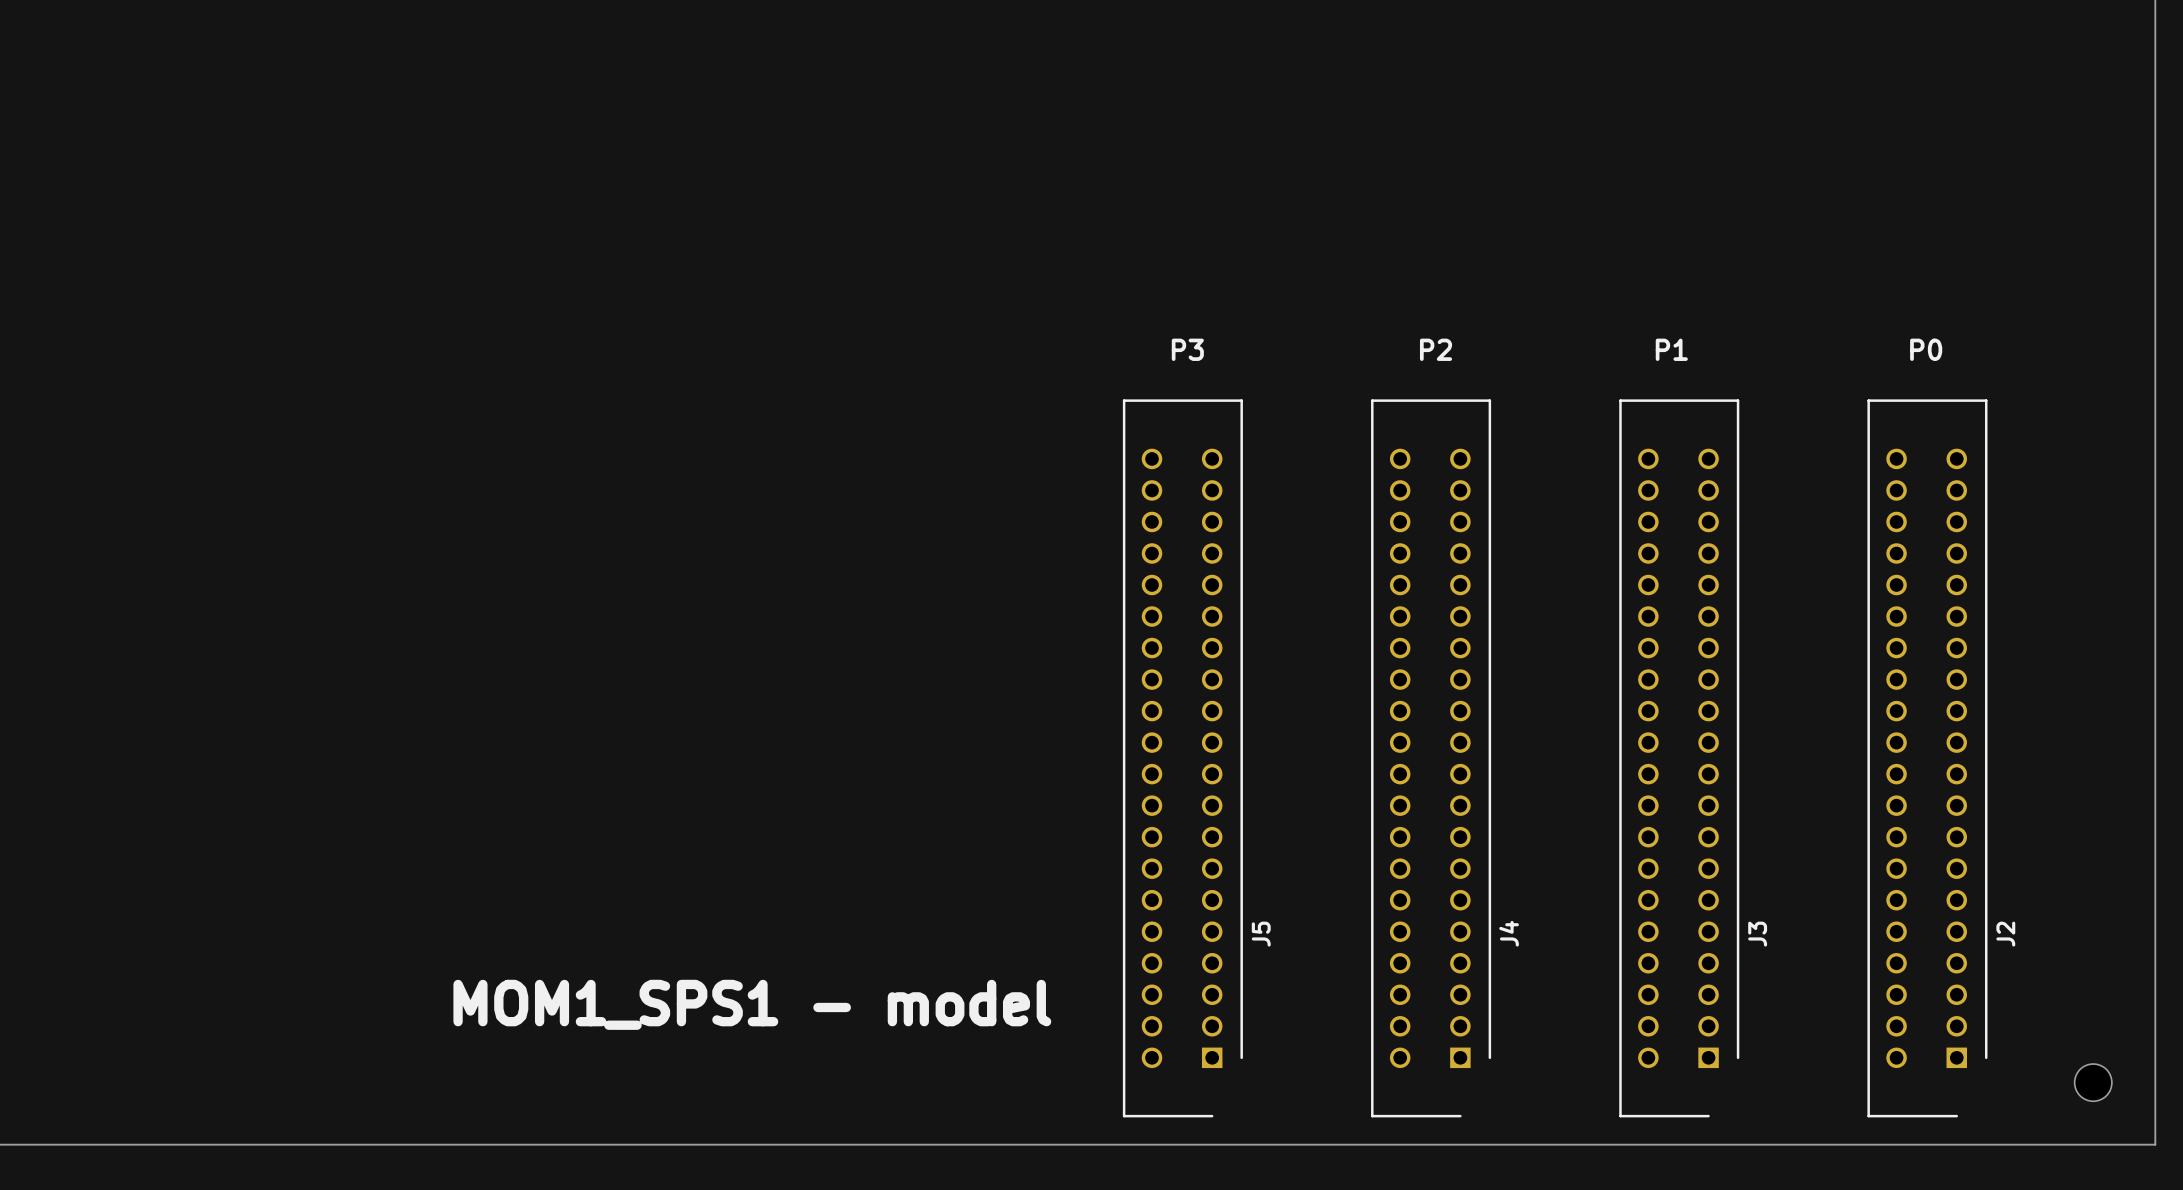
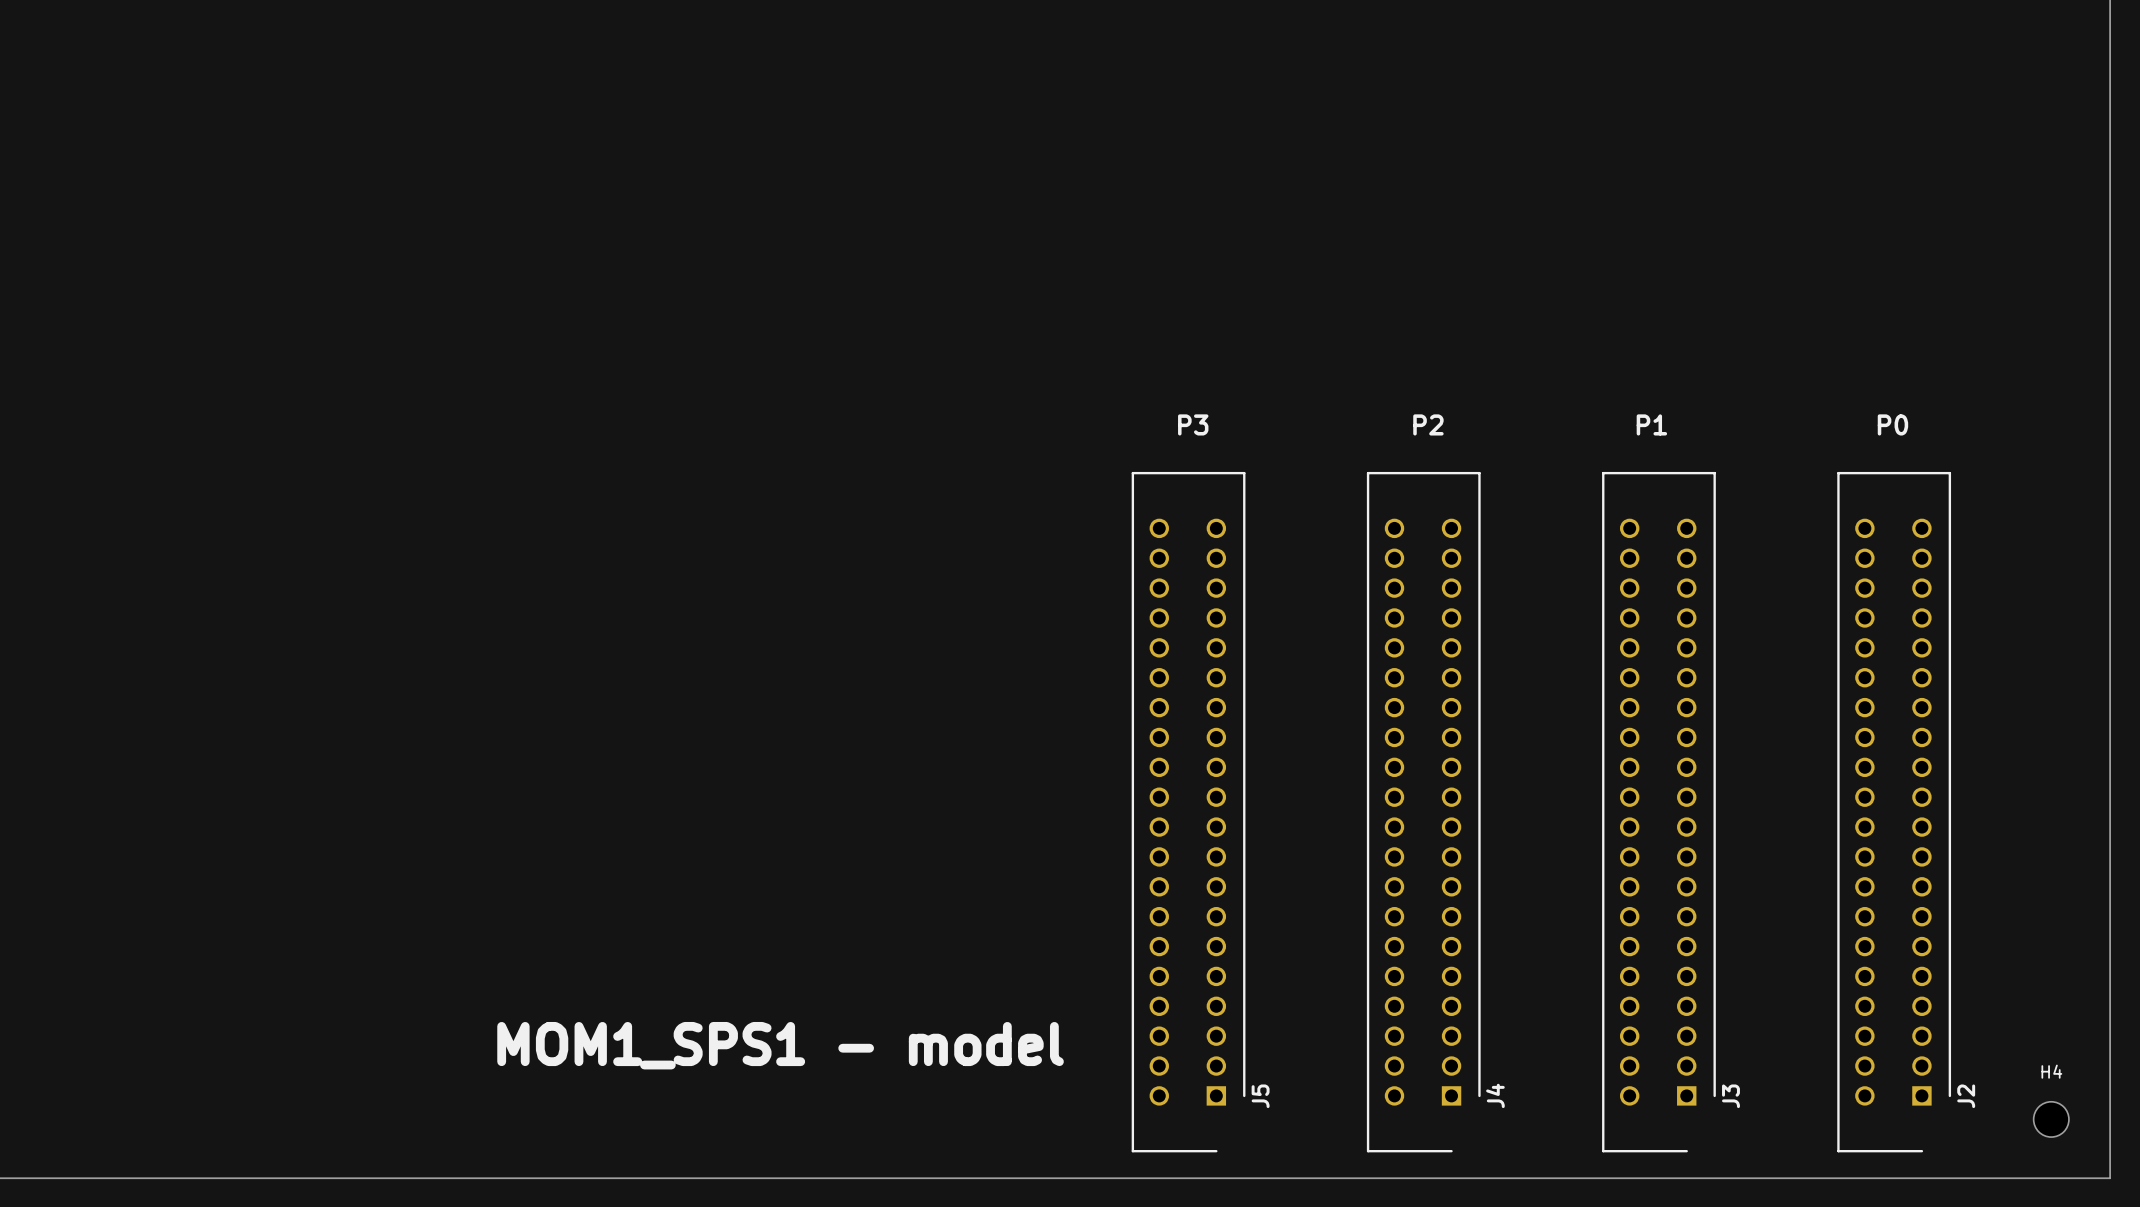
J4 name position: J4 (1509, 933) -> J4 (1495, 1095)
J5 name position: J5 (1261, 934) -> J5 (1260, 1096)
J3 name position: J3 (1757, 934) -> J3 (1730, 1096)
J2 name position: J2 (2005, 934) -> J2 (1966, 1096)
H4 name: none -> H4 (2051, 1071)

